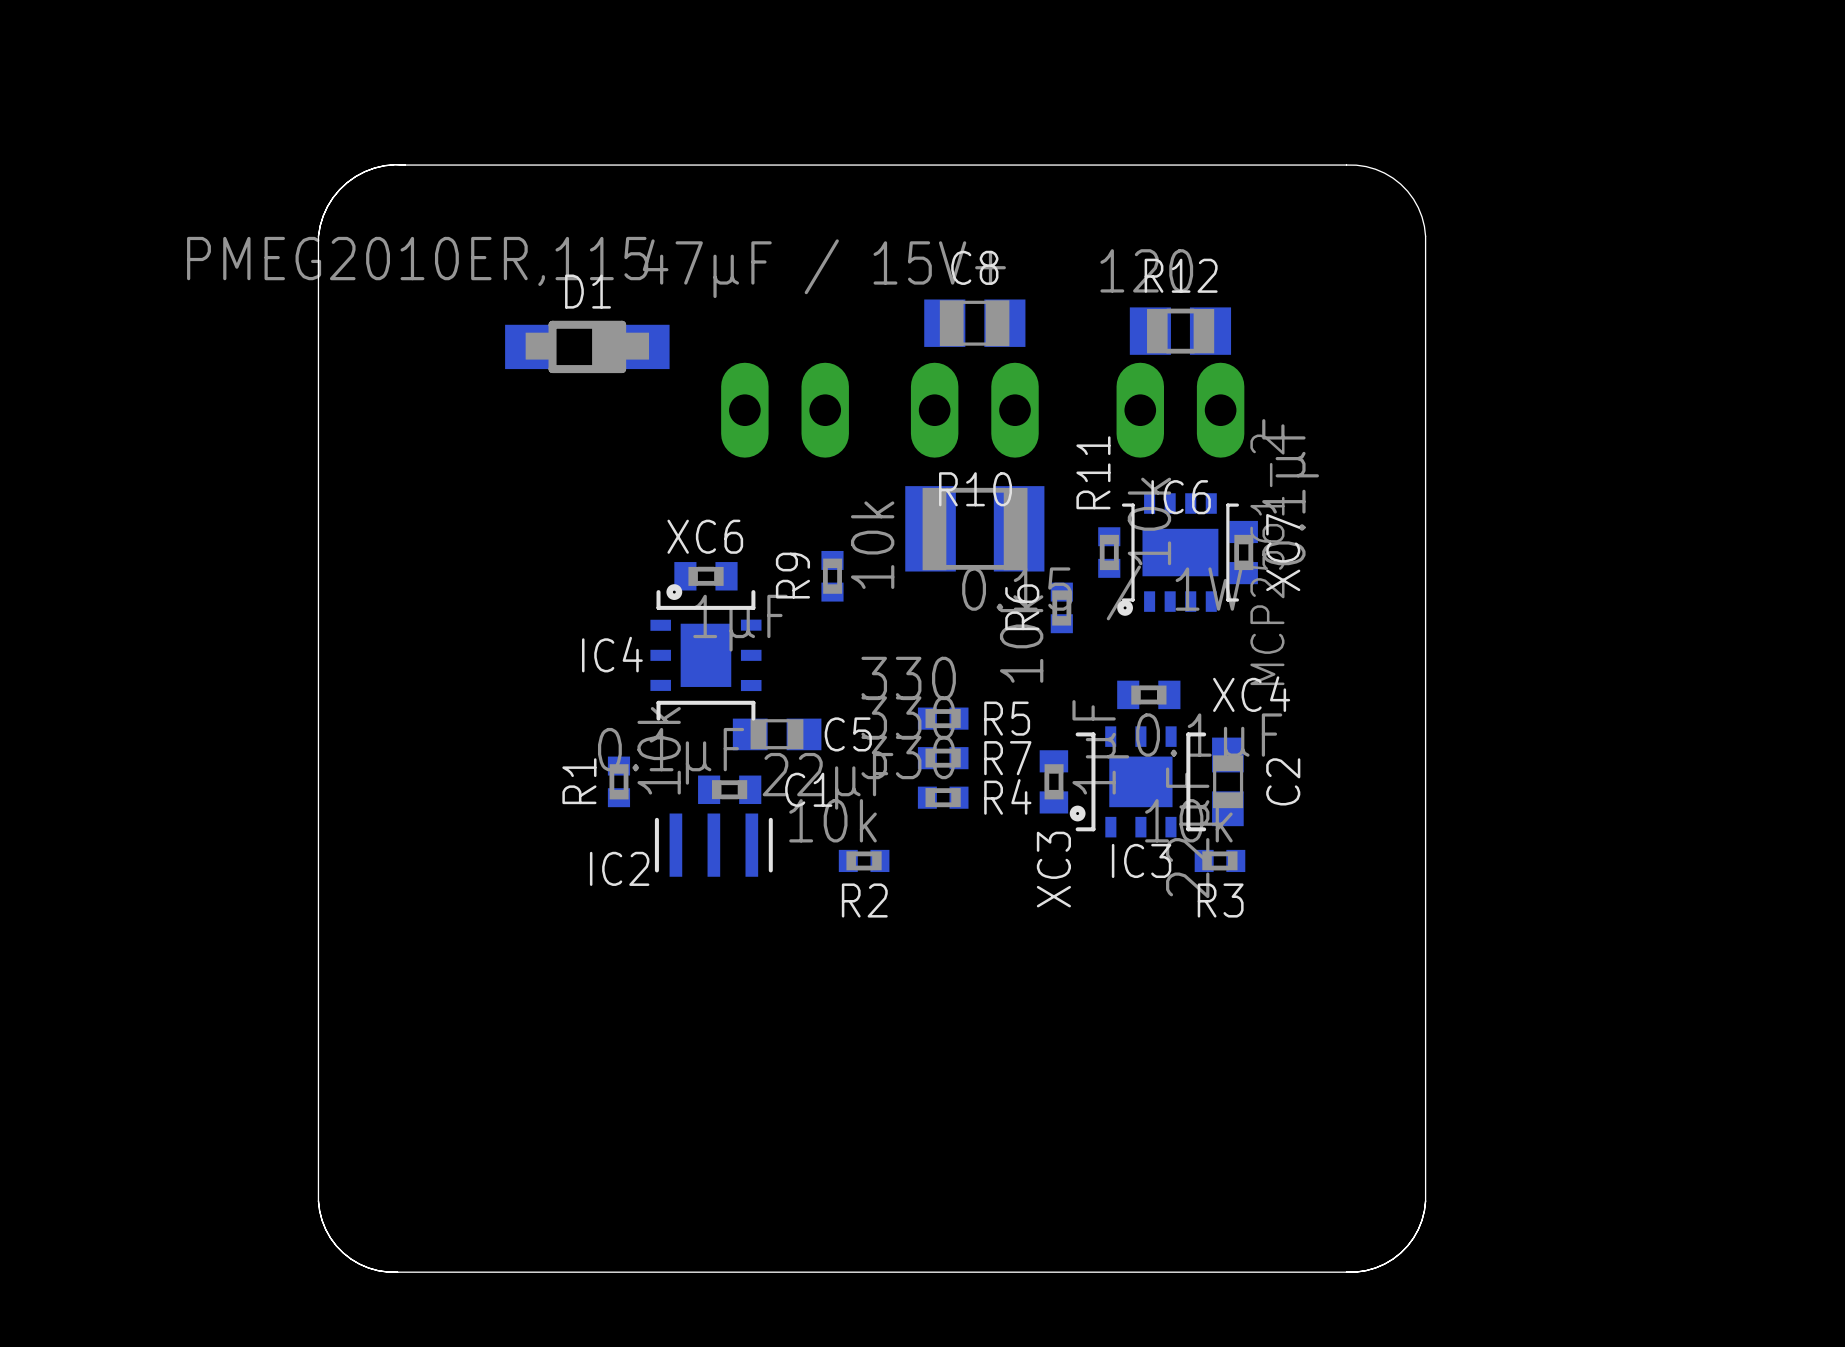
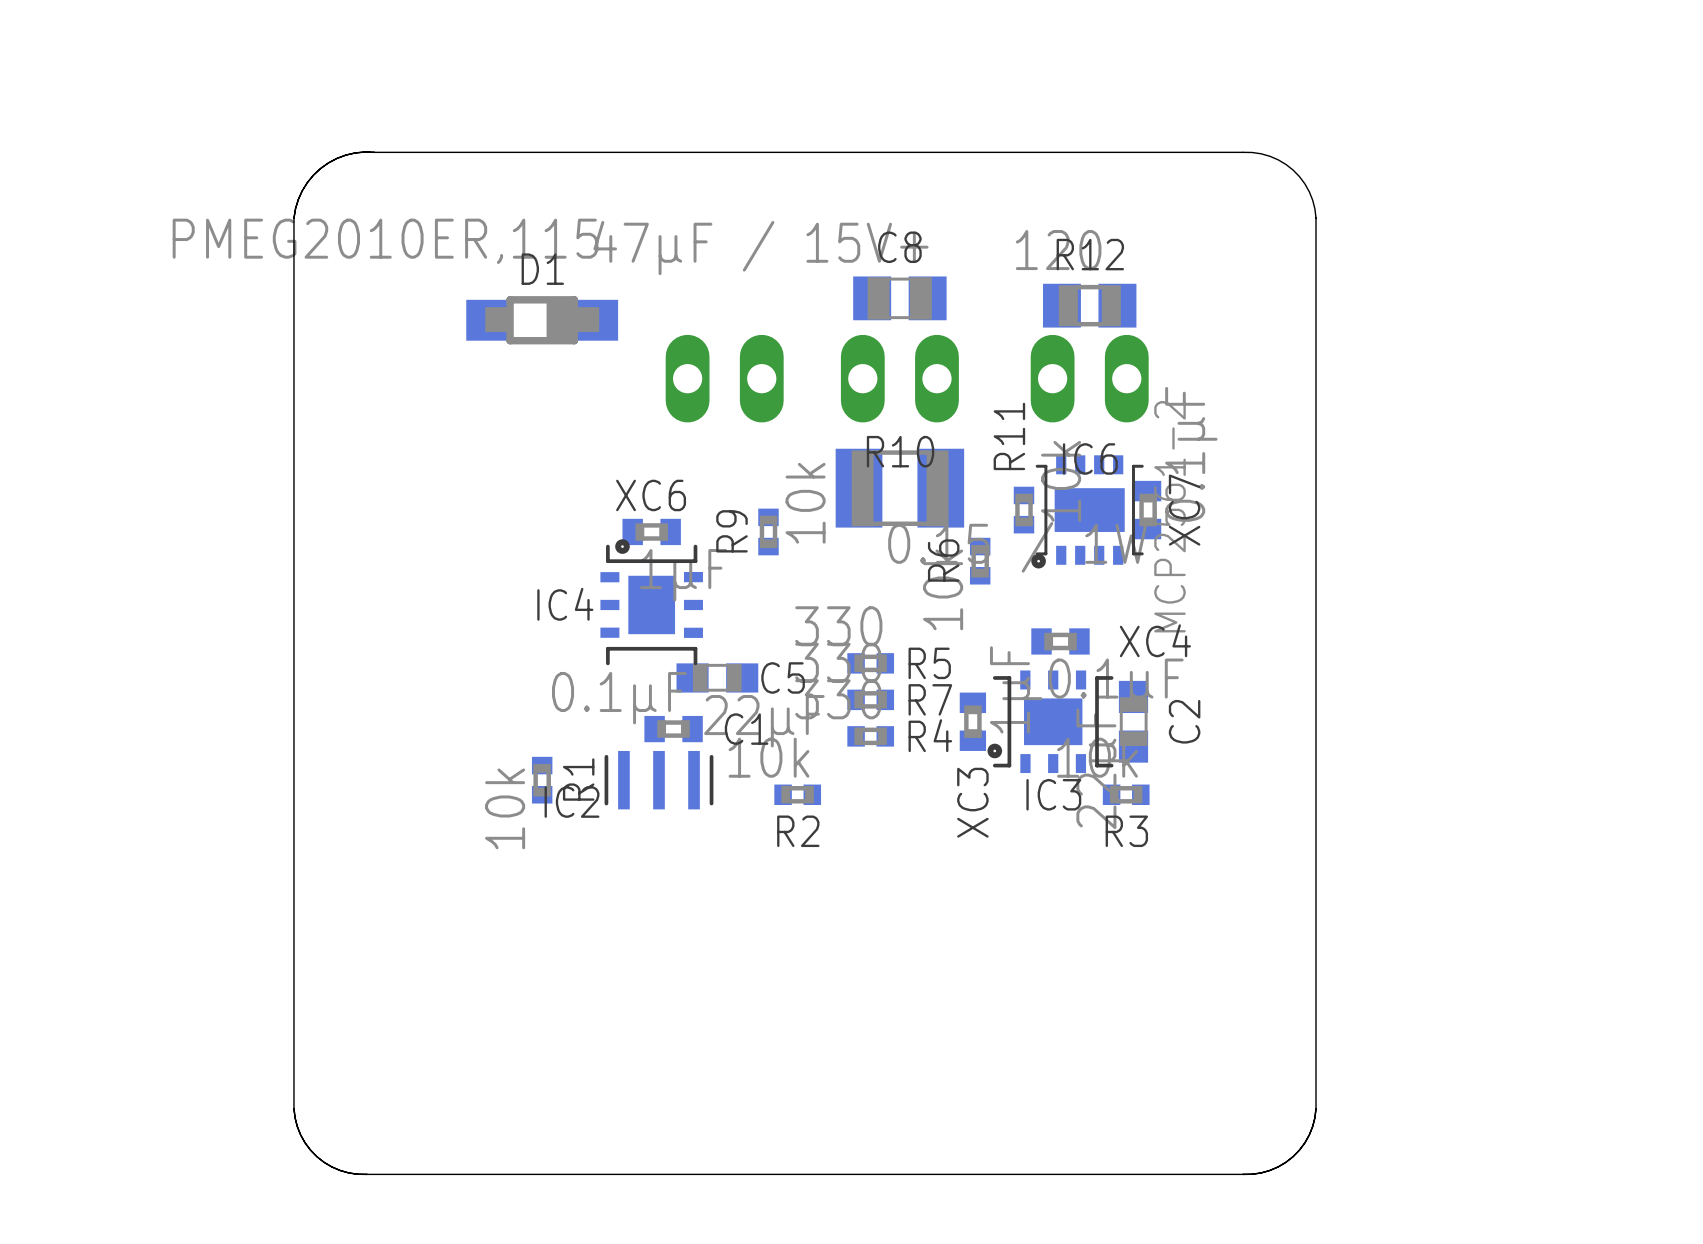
R1 value position: 10k (659, 750) -> 10k (505, 808)
R1 name position: R1 (579, 781) -> R1 (578, 779)
R1 position: (618, 781) -> (542, 780)

